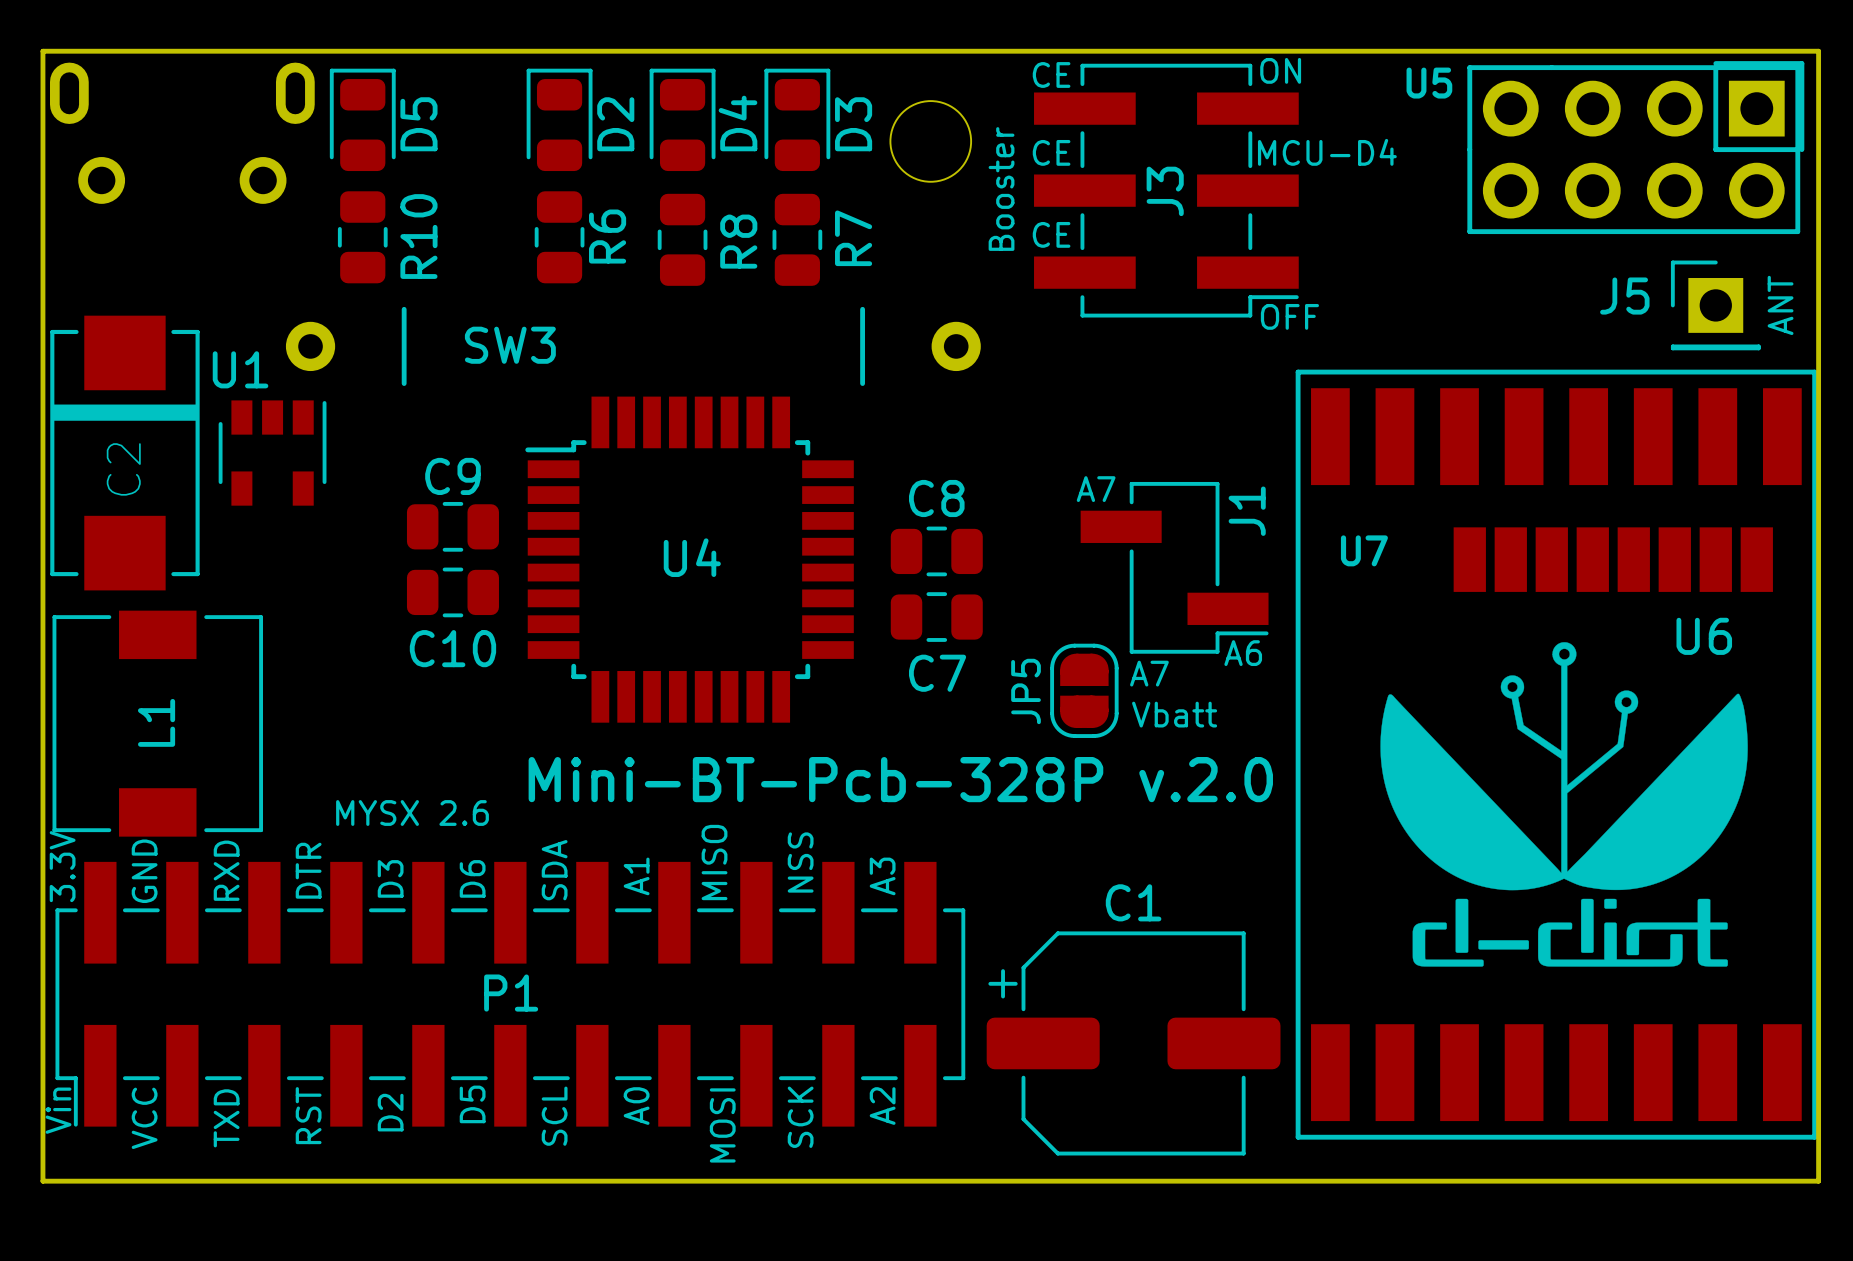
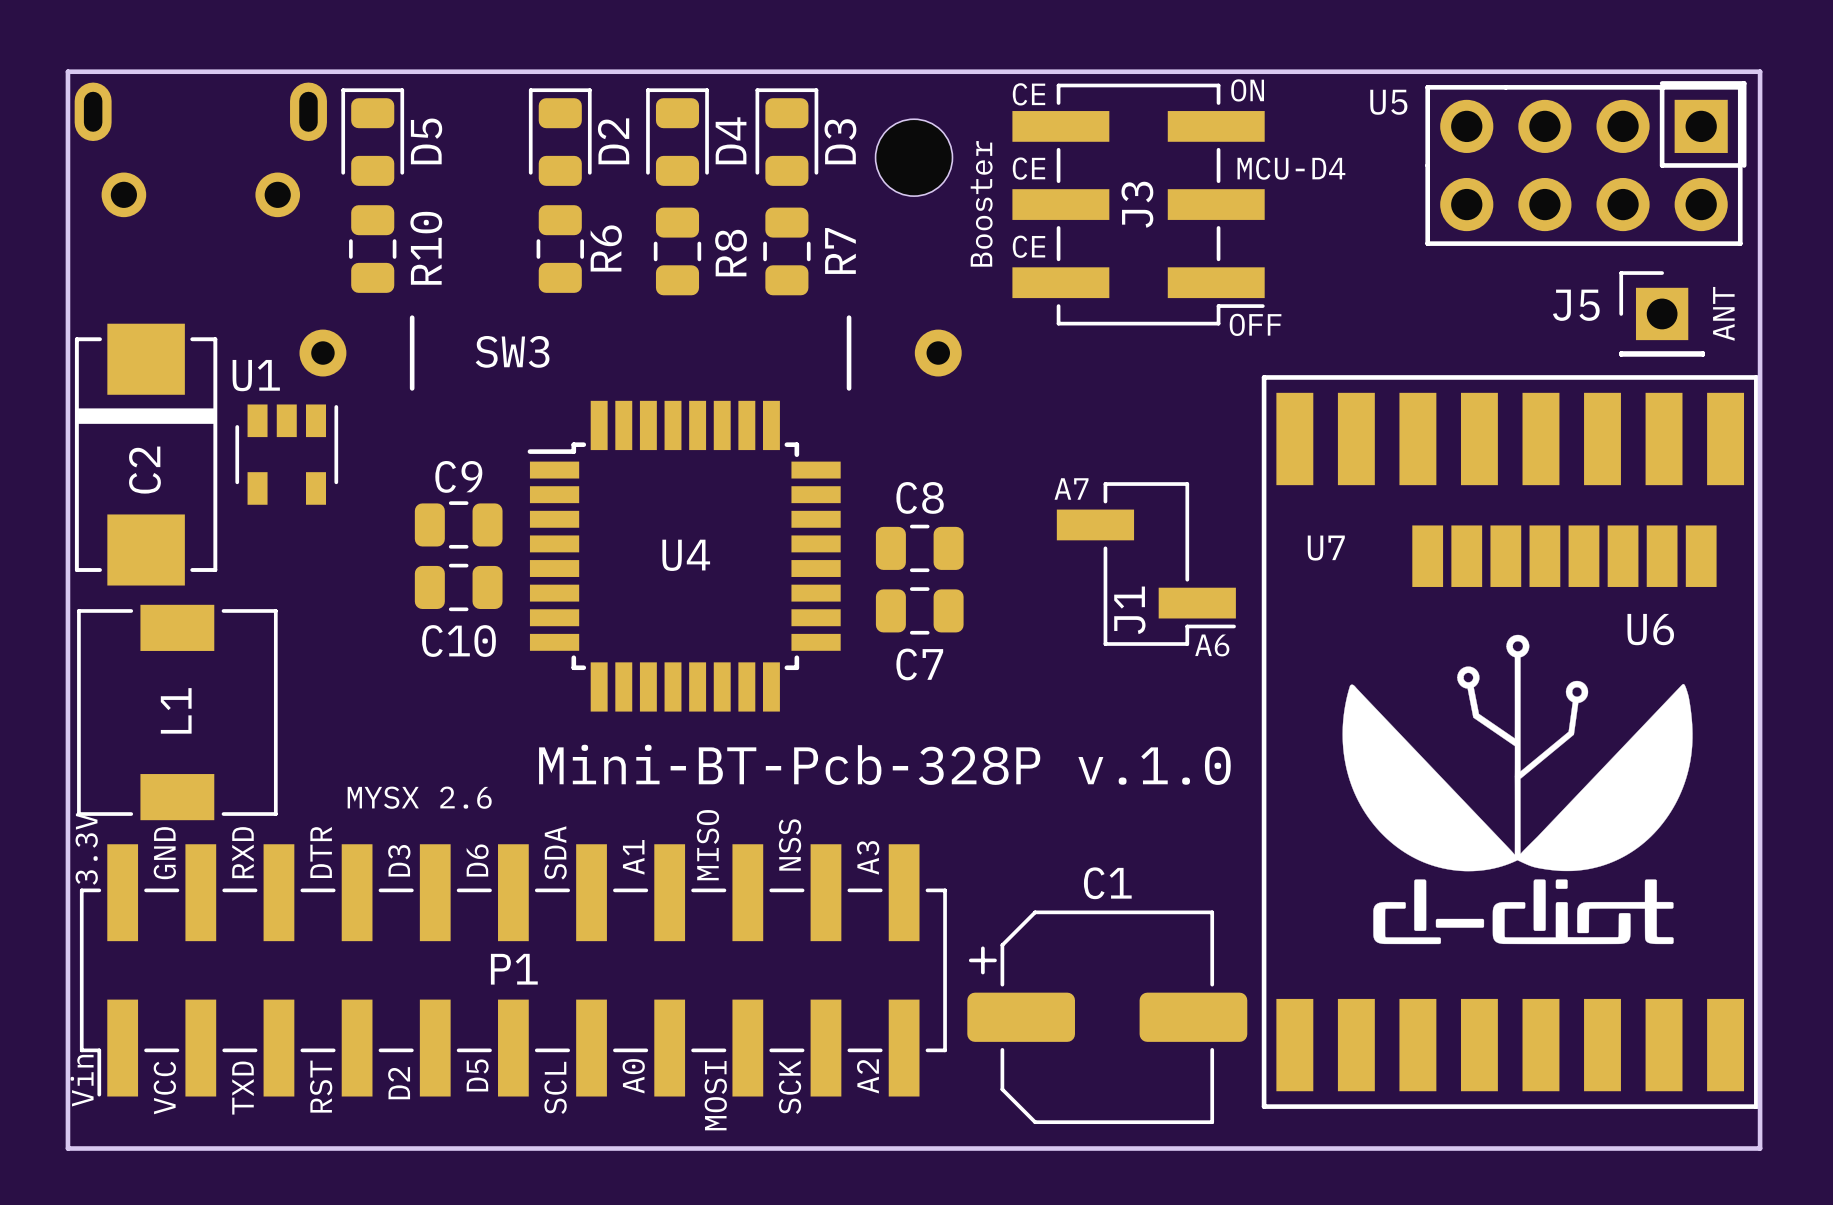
J1 name position: J1 (1247, 511) -> J1 (1129, 610)
text: A7 (1149, 673) -> none
JP5: (1084, 690) -> none
text: Vbatt (1174, 714) -> none
text: Mini-BT-Pcb-328P v.2.0 (900, 779) -> Mini-BT-Pcb-328P v.1.0 (884, 764)

